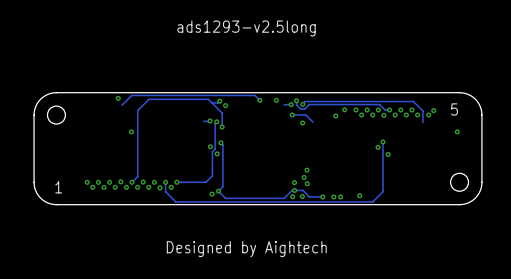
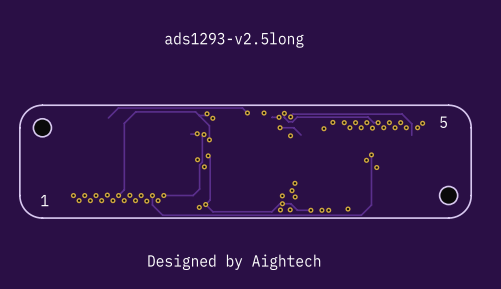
via: (118, 98) -> none
via: (131, 131) -> none
via: (457, 131) -> none

